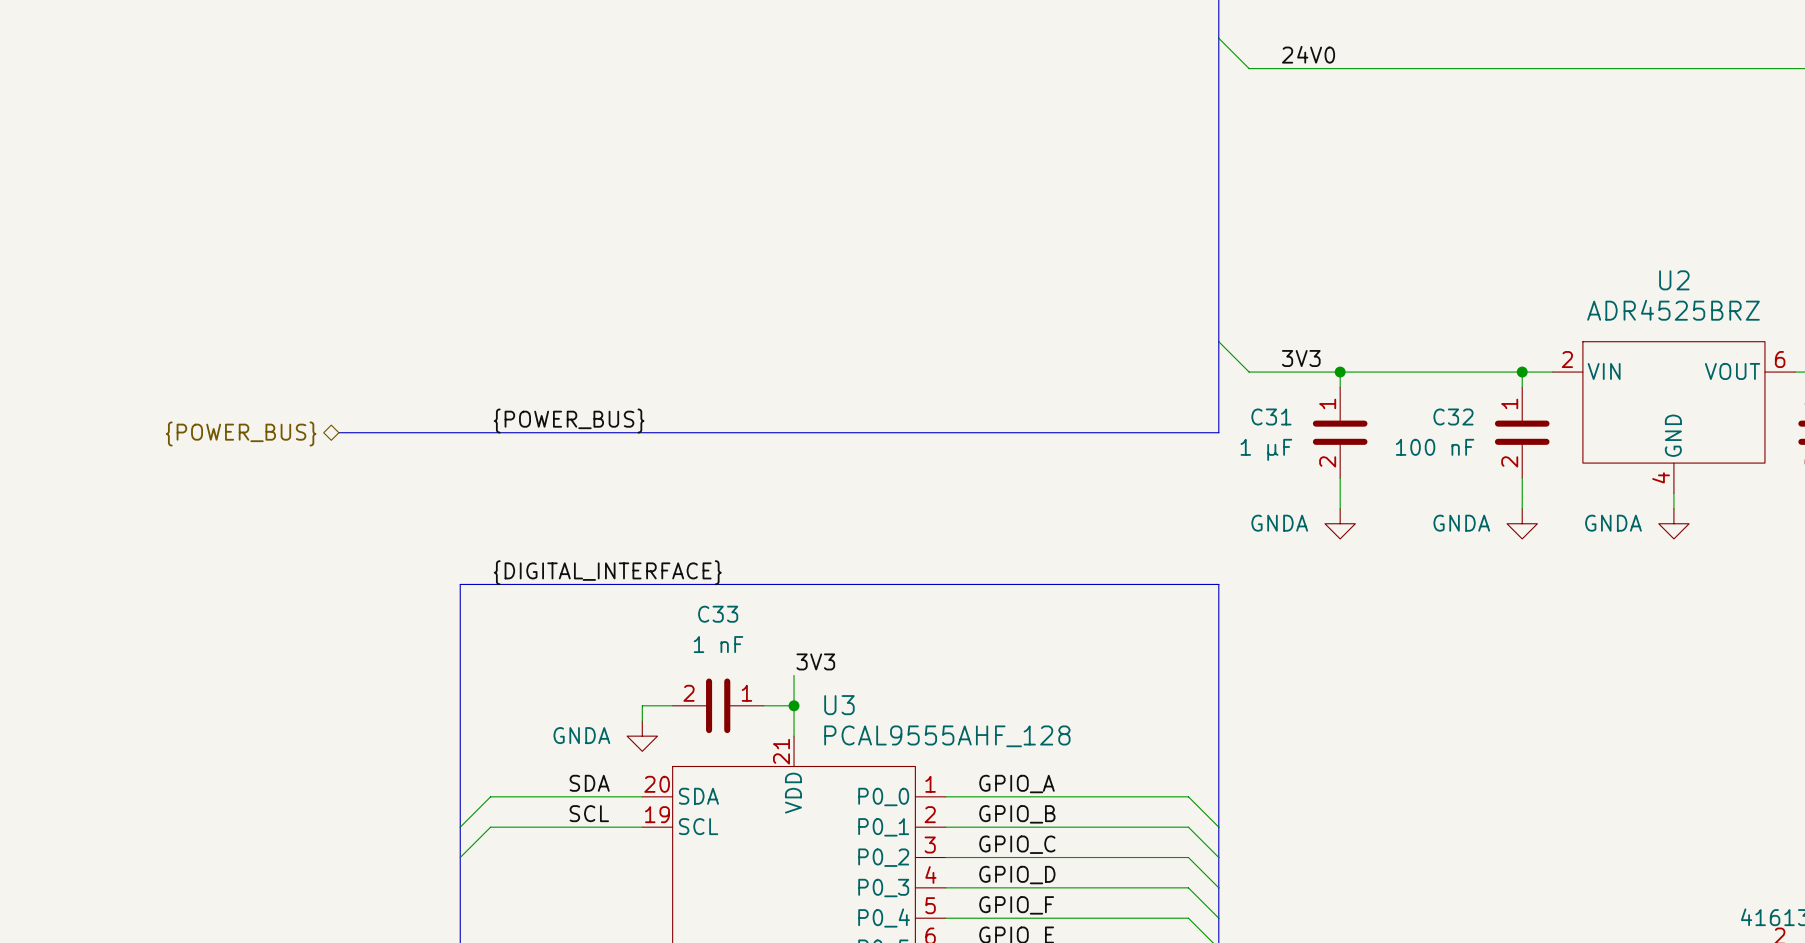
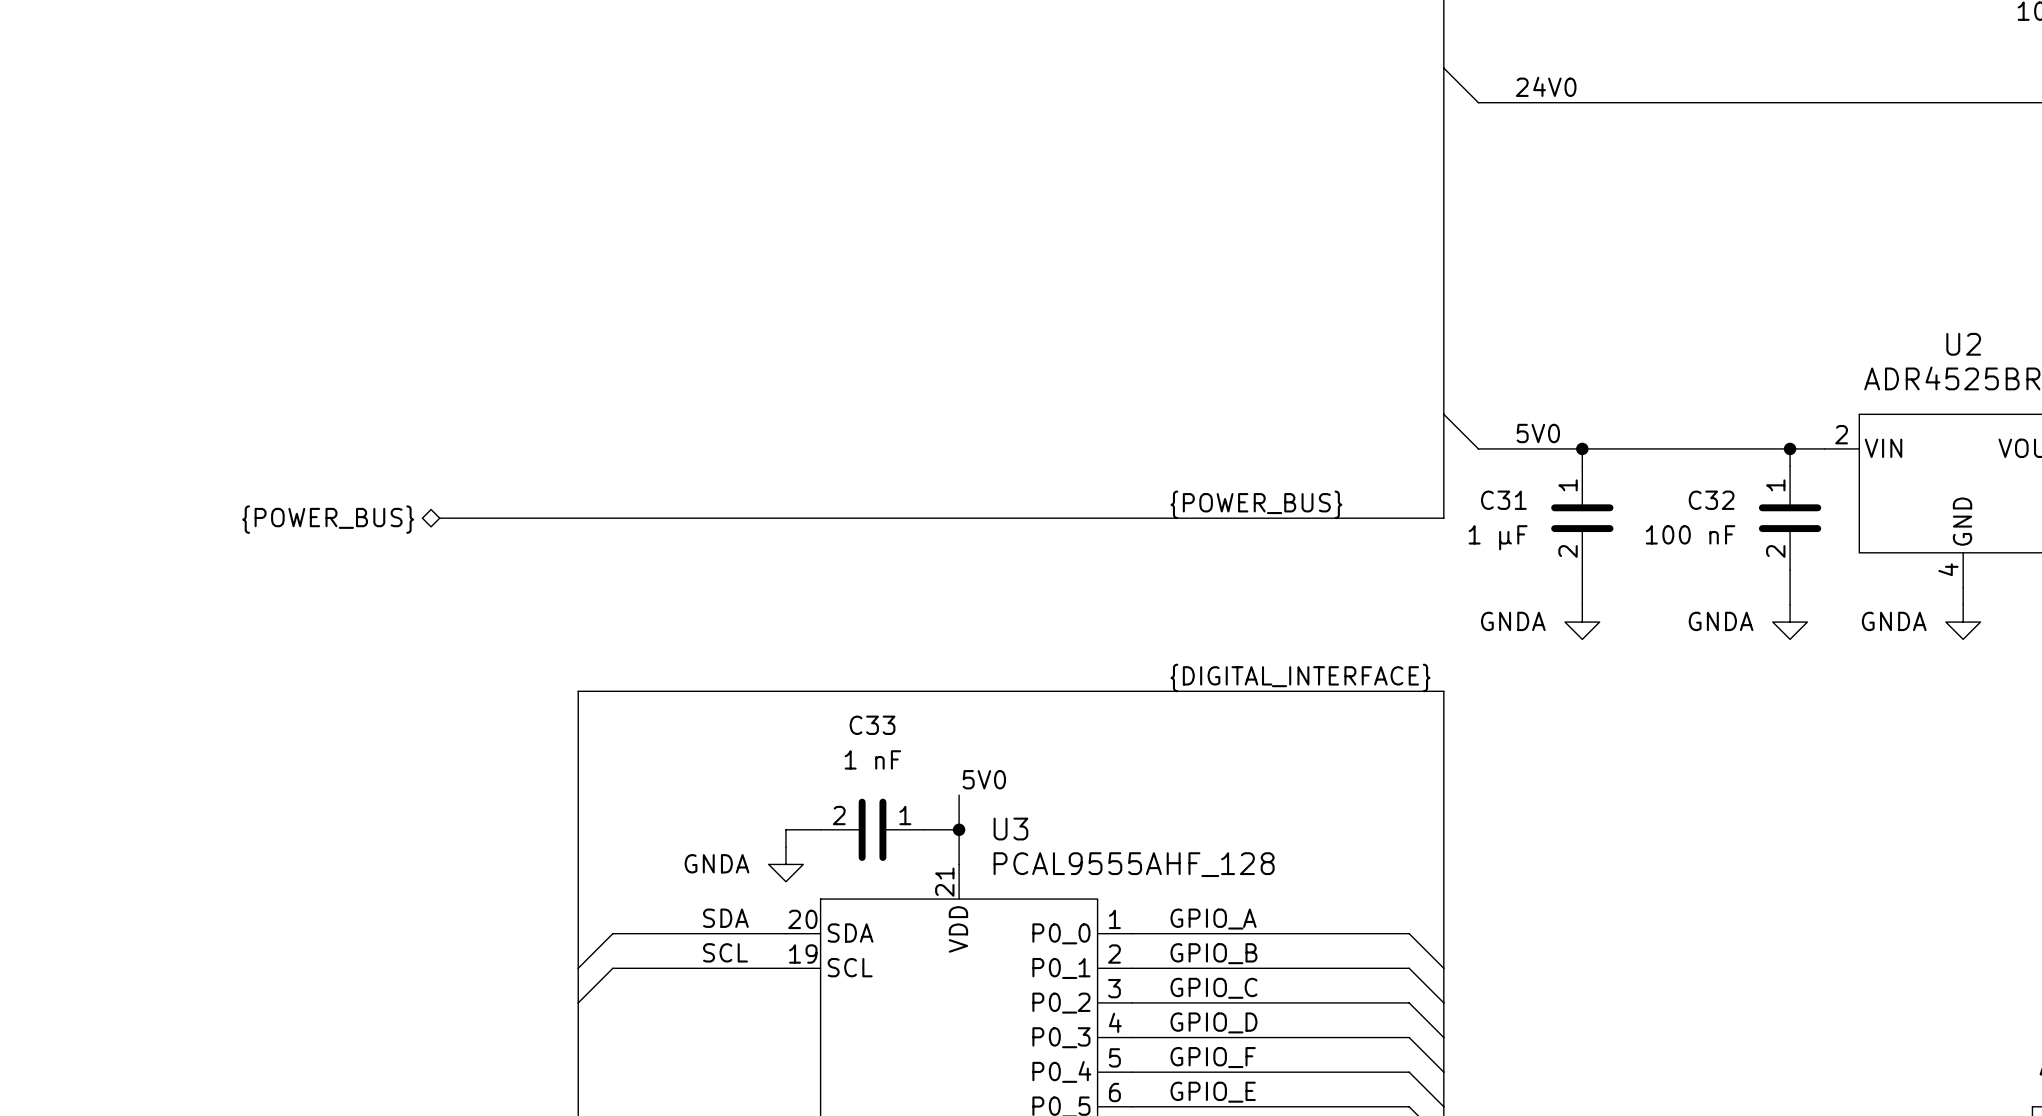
label: 3V3 (1301, 358) -> 5V0 (1538, 433)
label: {POWER_BUS} (569, 421) -> none
label: none -> {POWER_BUS} (1256, 504)
label: {DIGITAL_INTERFACE} (607, 572) -> none
label: none -> {DIGITAL_INTERFACE} (1300, 677)
label: 3V3 (815, 661) -> 5V0 (984, 779)

